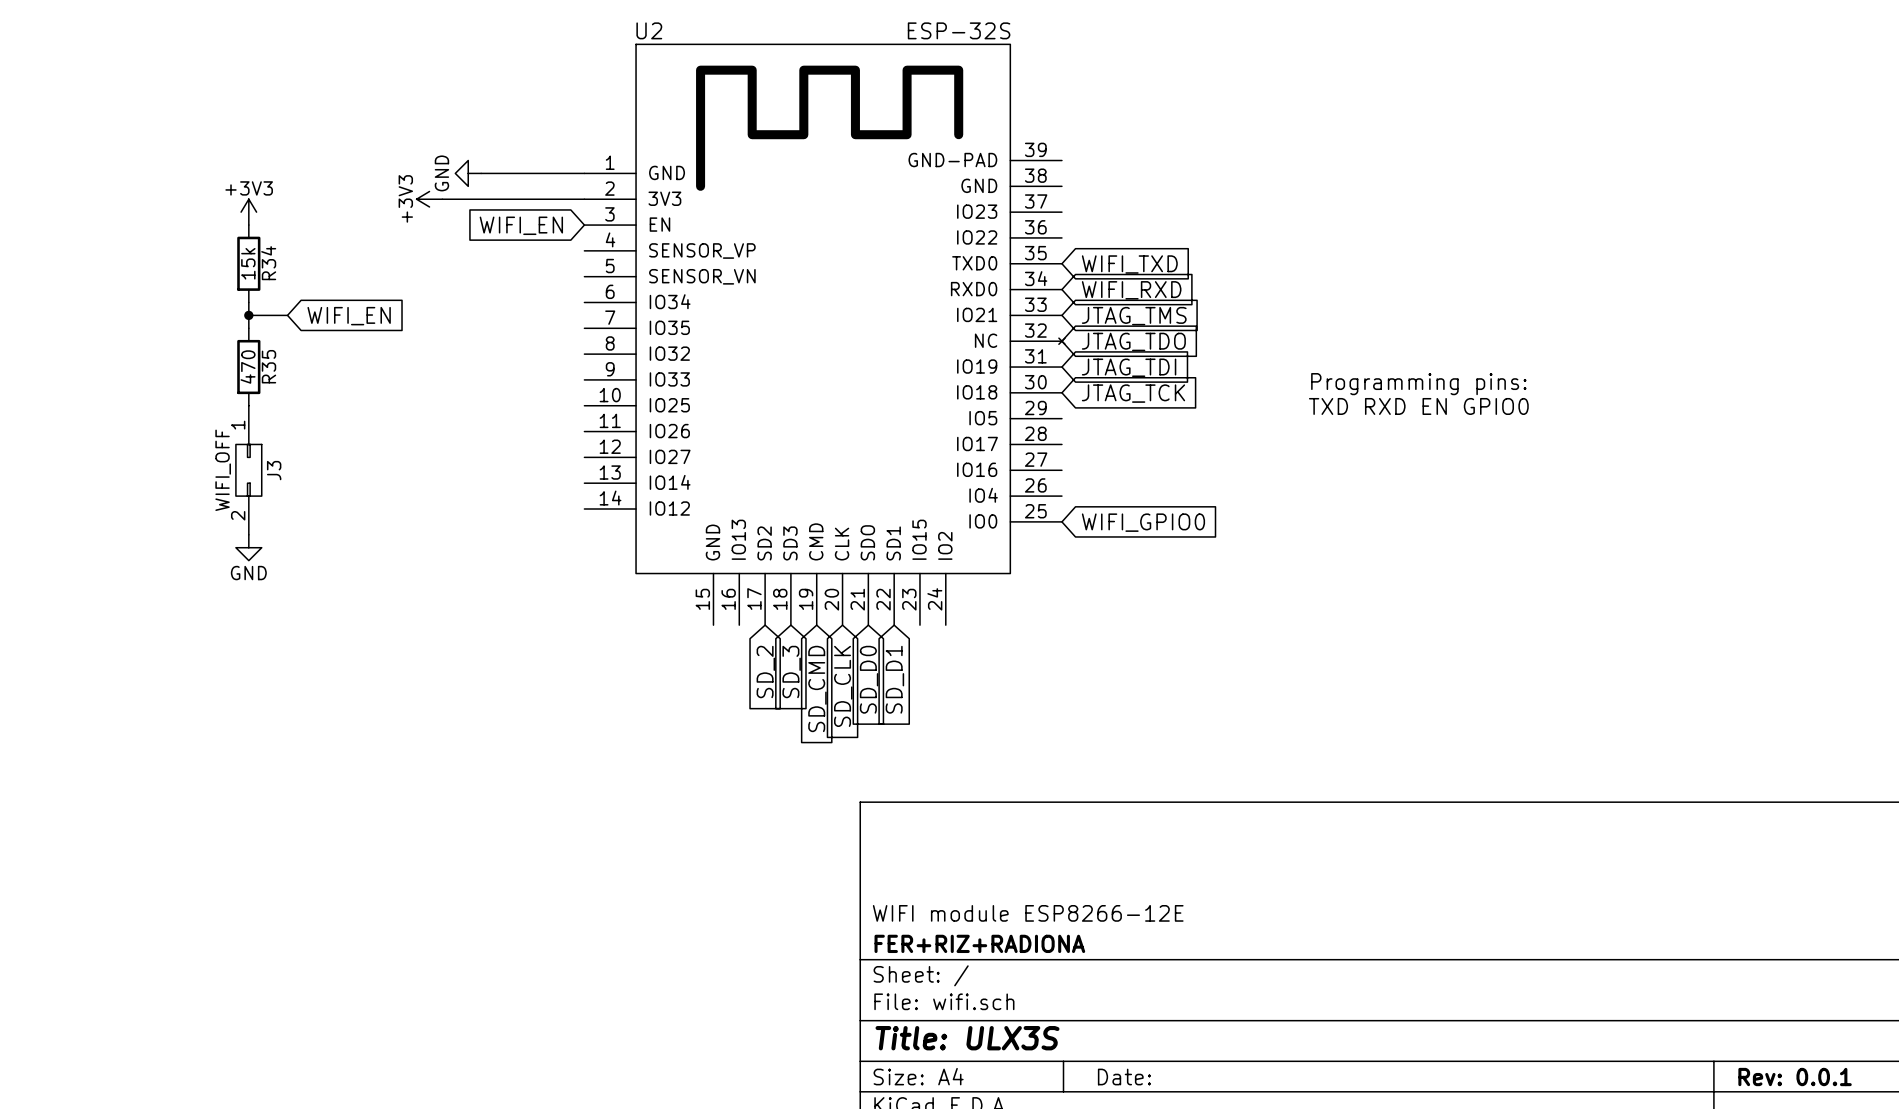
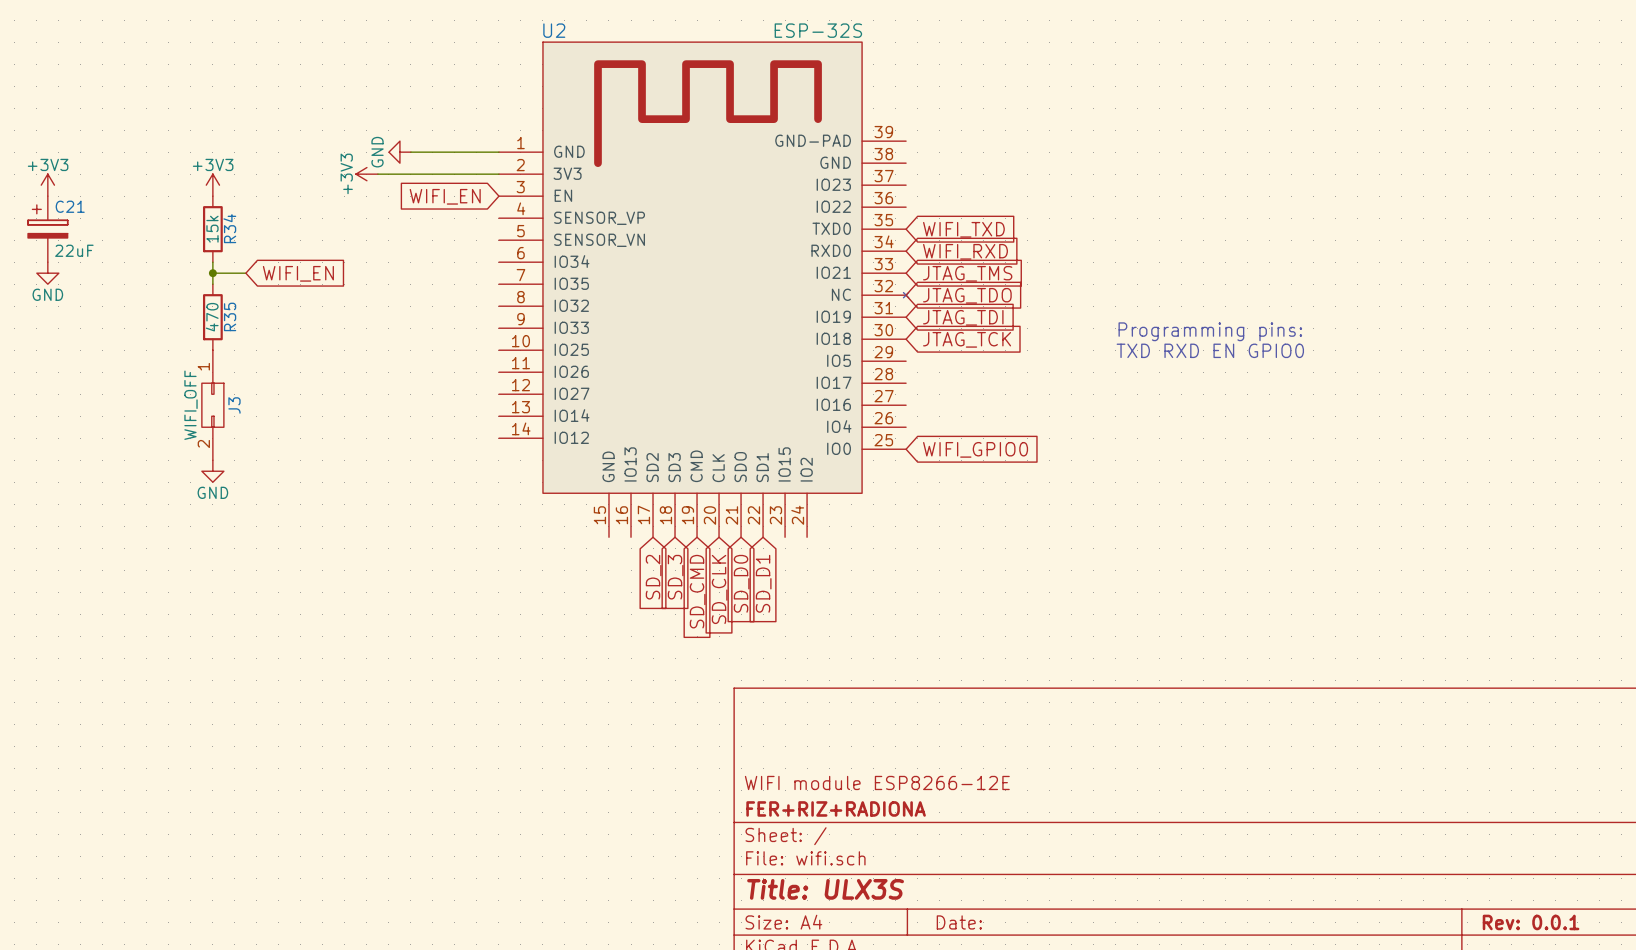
power symbol: none -> +3V3 (47, 185)
C21: none -> 22uF (47, 229)
power symbol: none -> GND (47, 273)

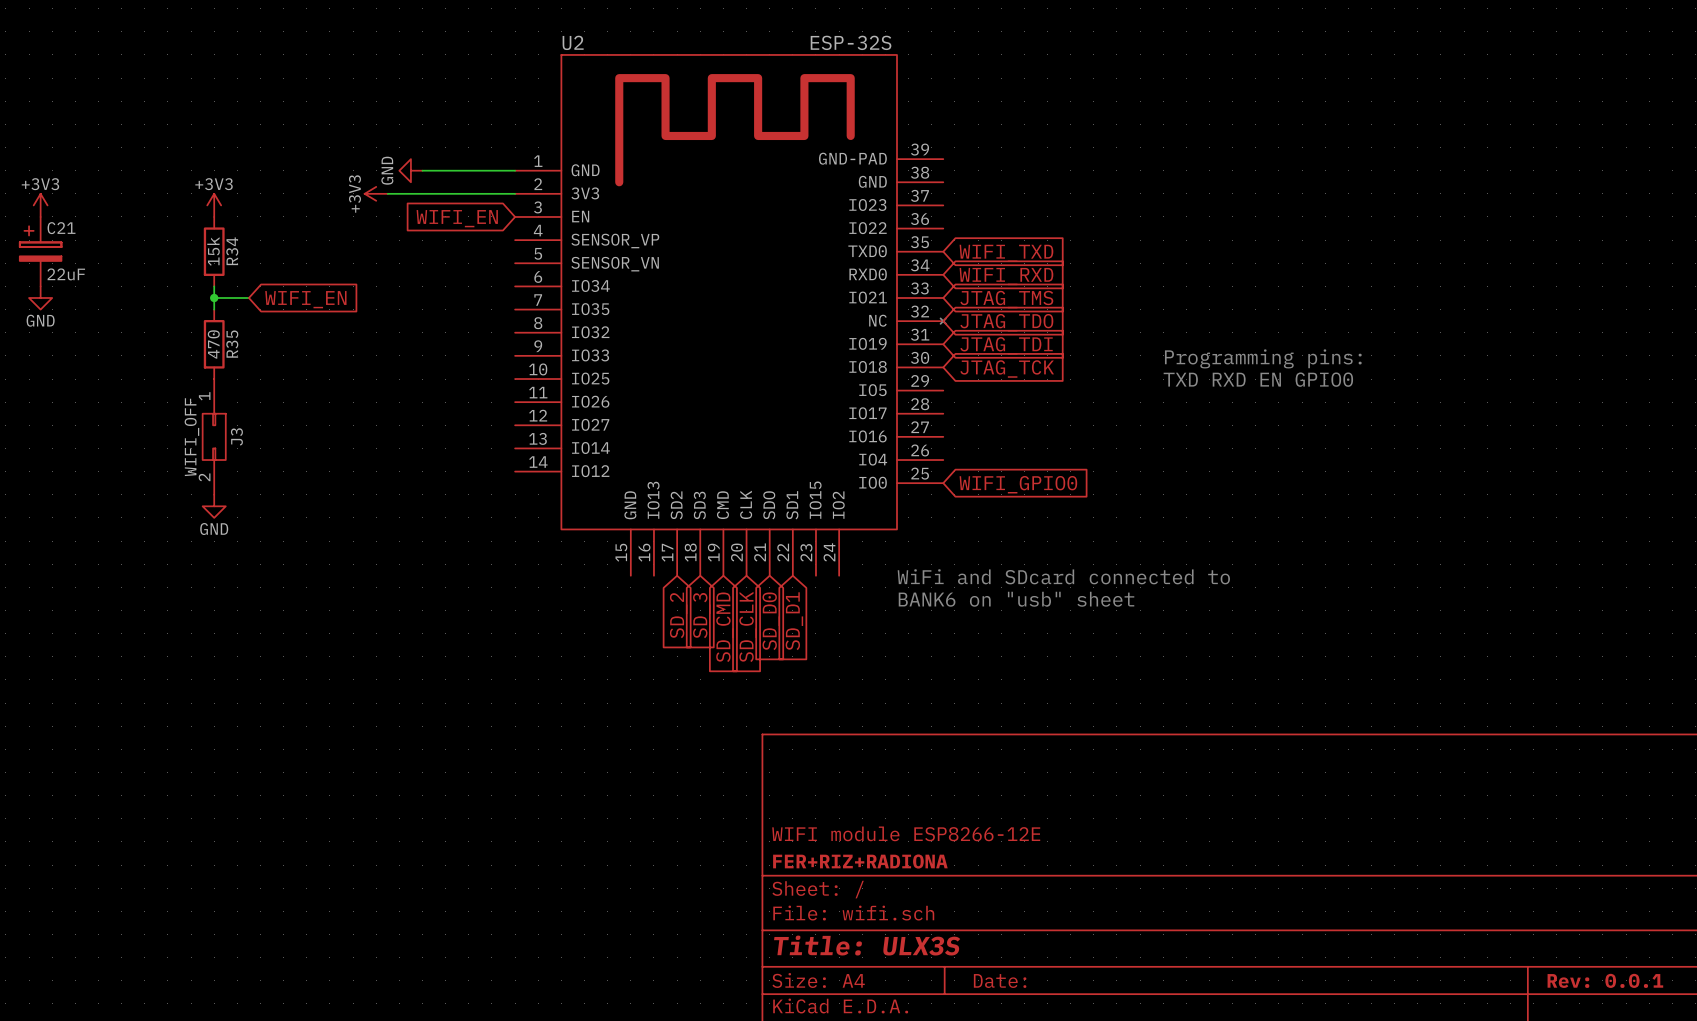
text: none -> WiFi and SDcard connected to (1063, 576)
text: none -> BANK6 on "usb" sheet (1016, 599)

